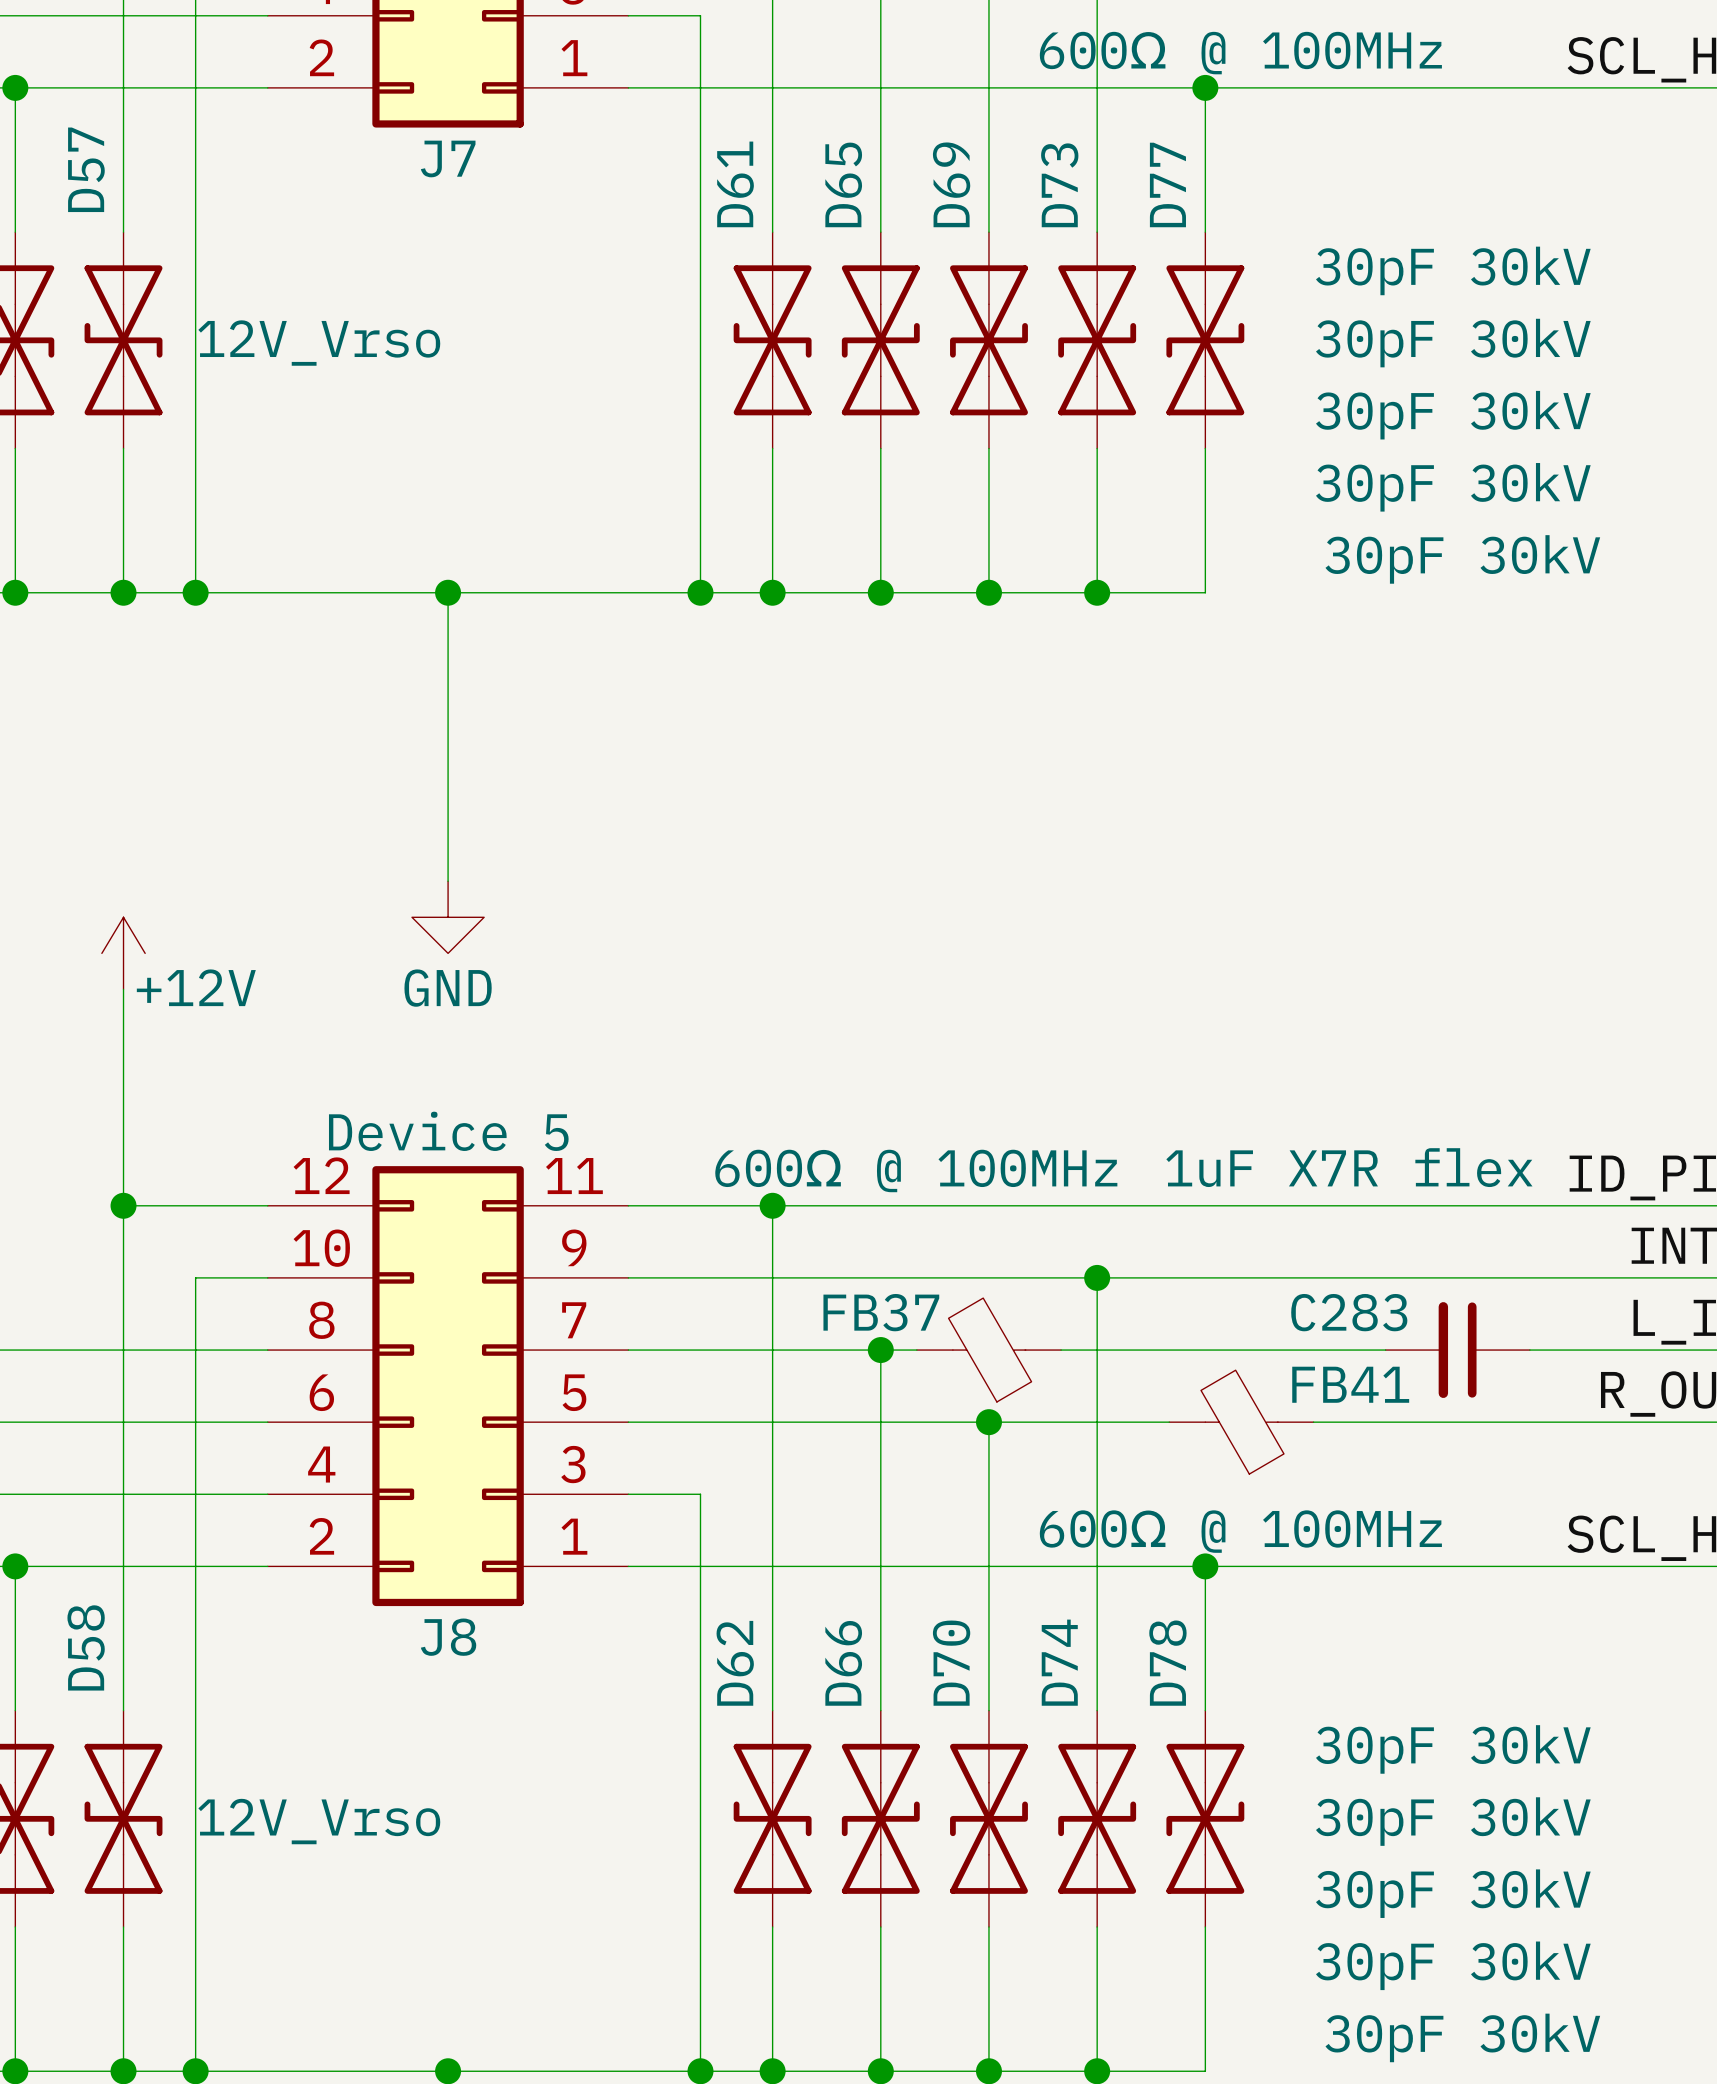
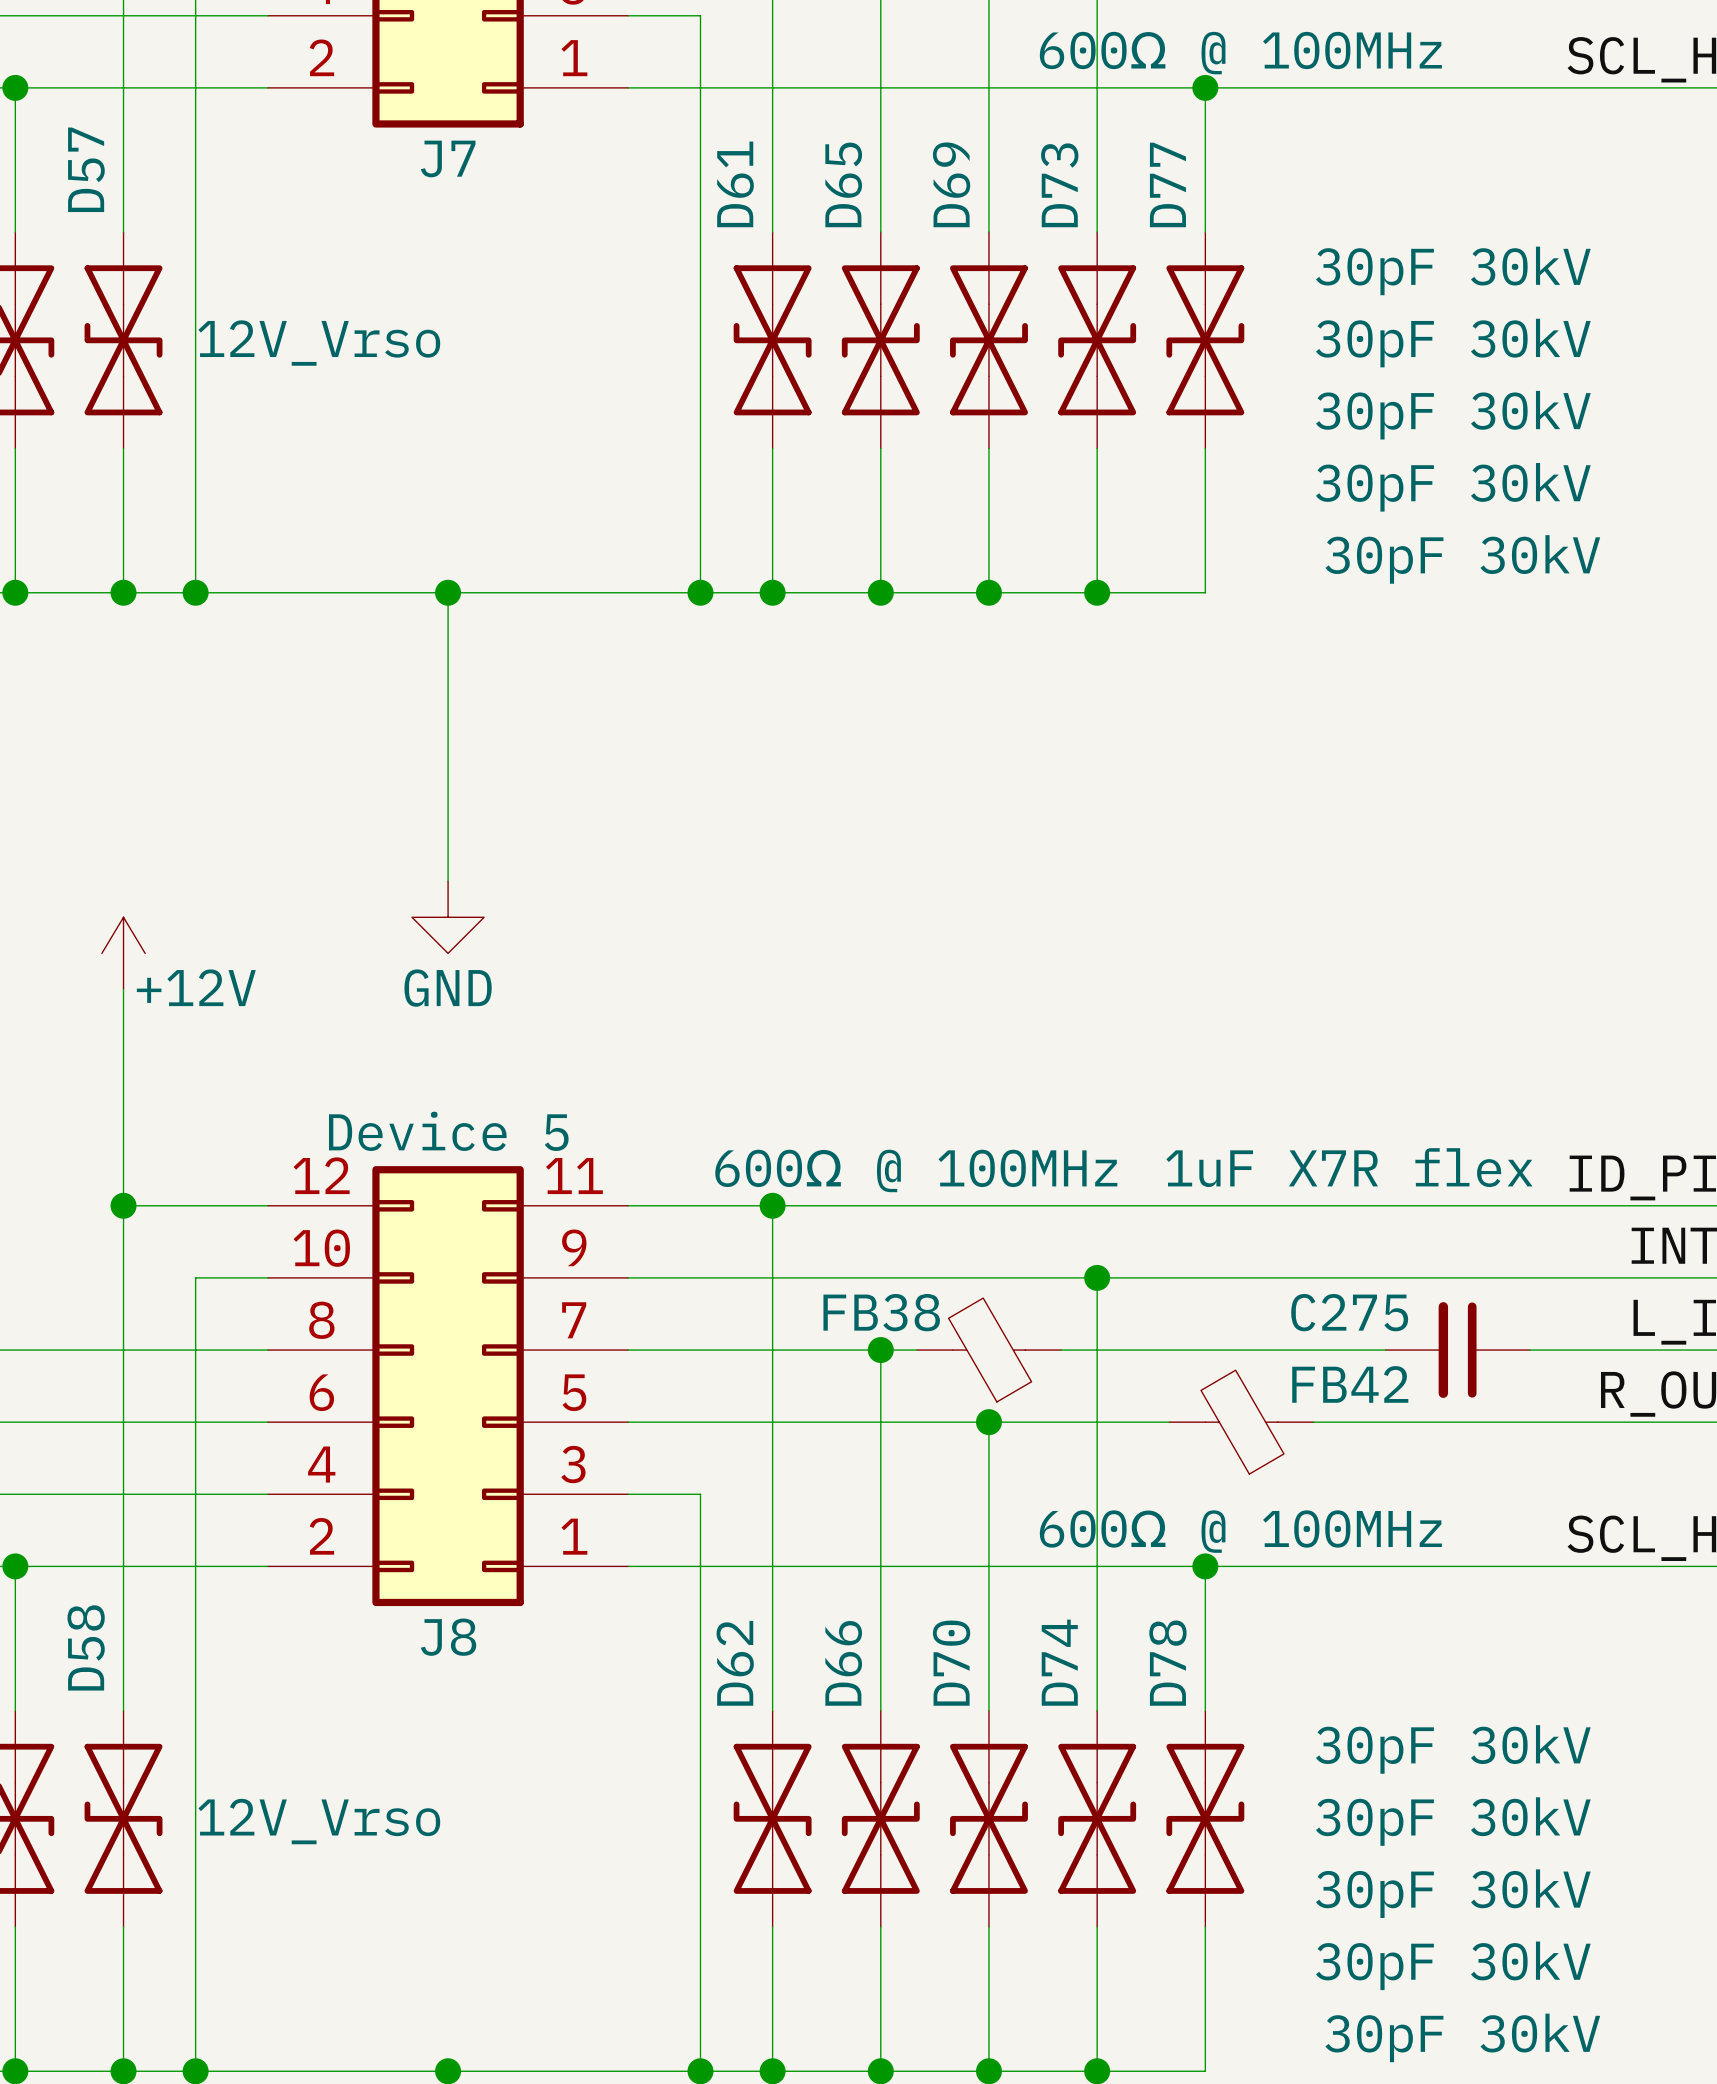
FB37 name: FB37 (881, 1312) -> FB38 (881, 1312)
C283 name: C283 (1349, 1312) -> C275 (1349, 1312)
FB41 name: FB41 (1350, 1384) -> FB42 (1350, 1384)

